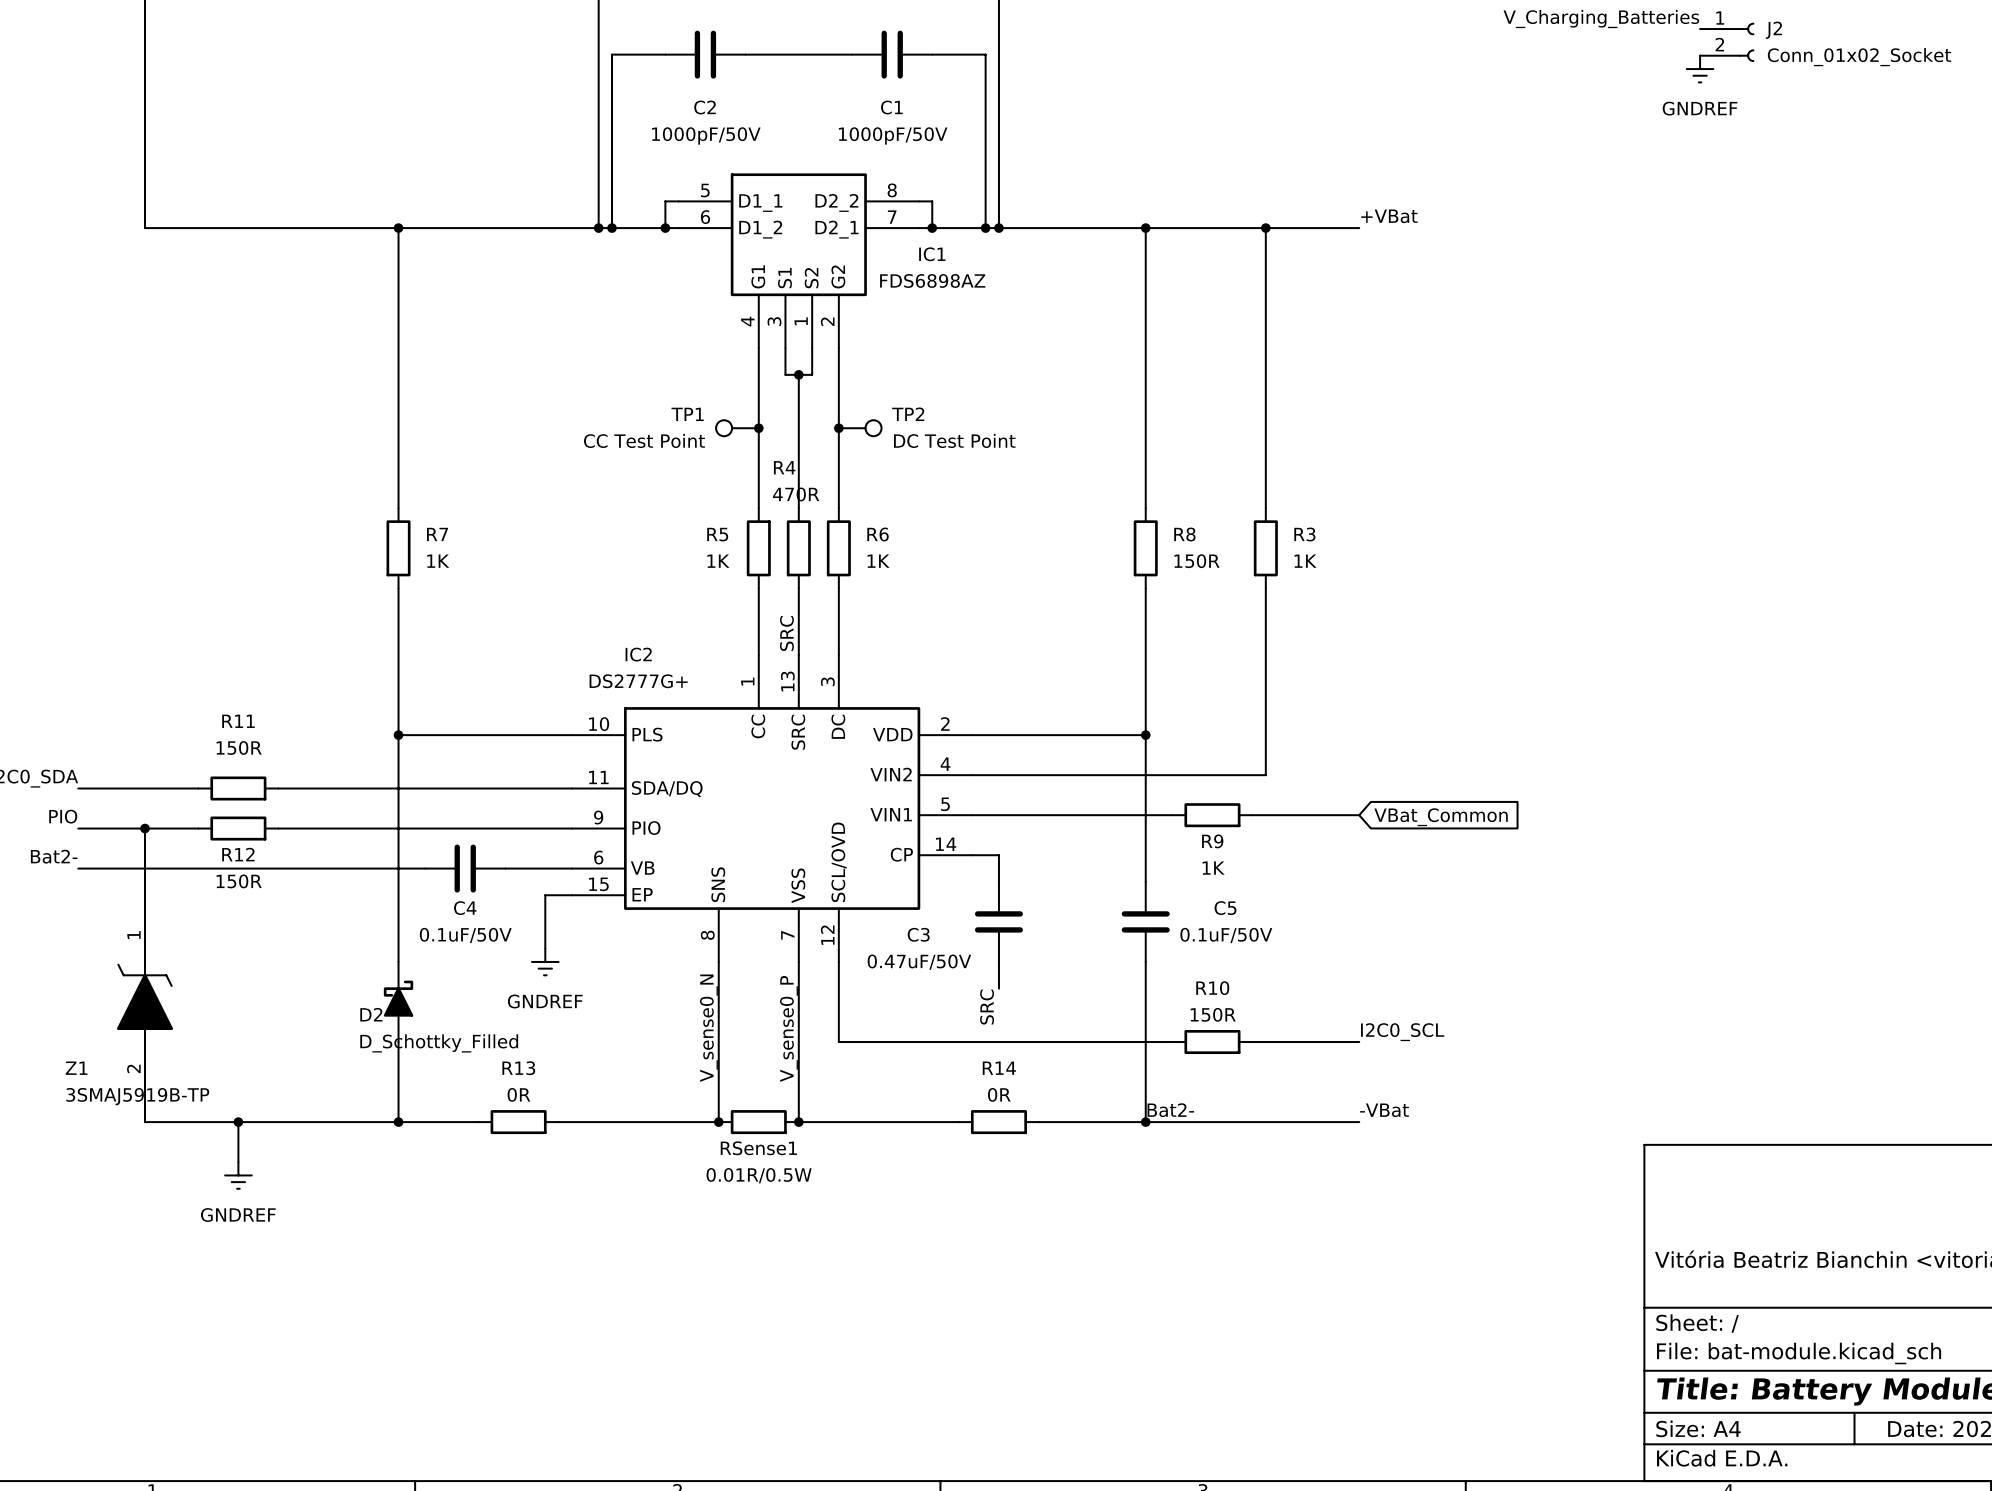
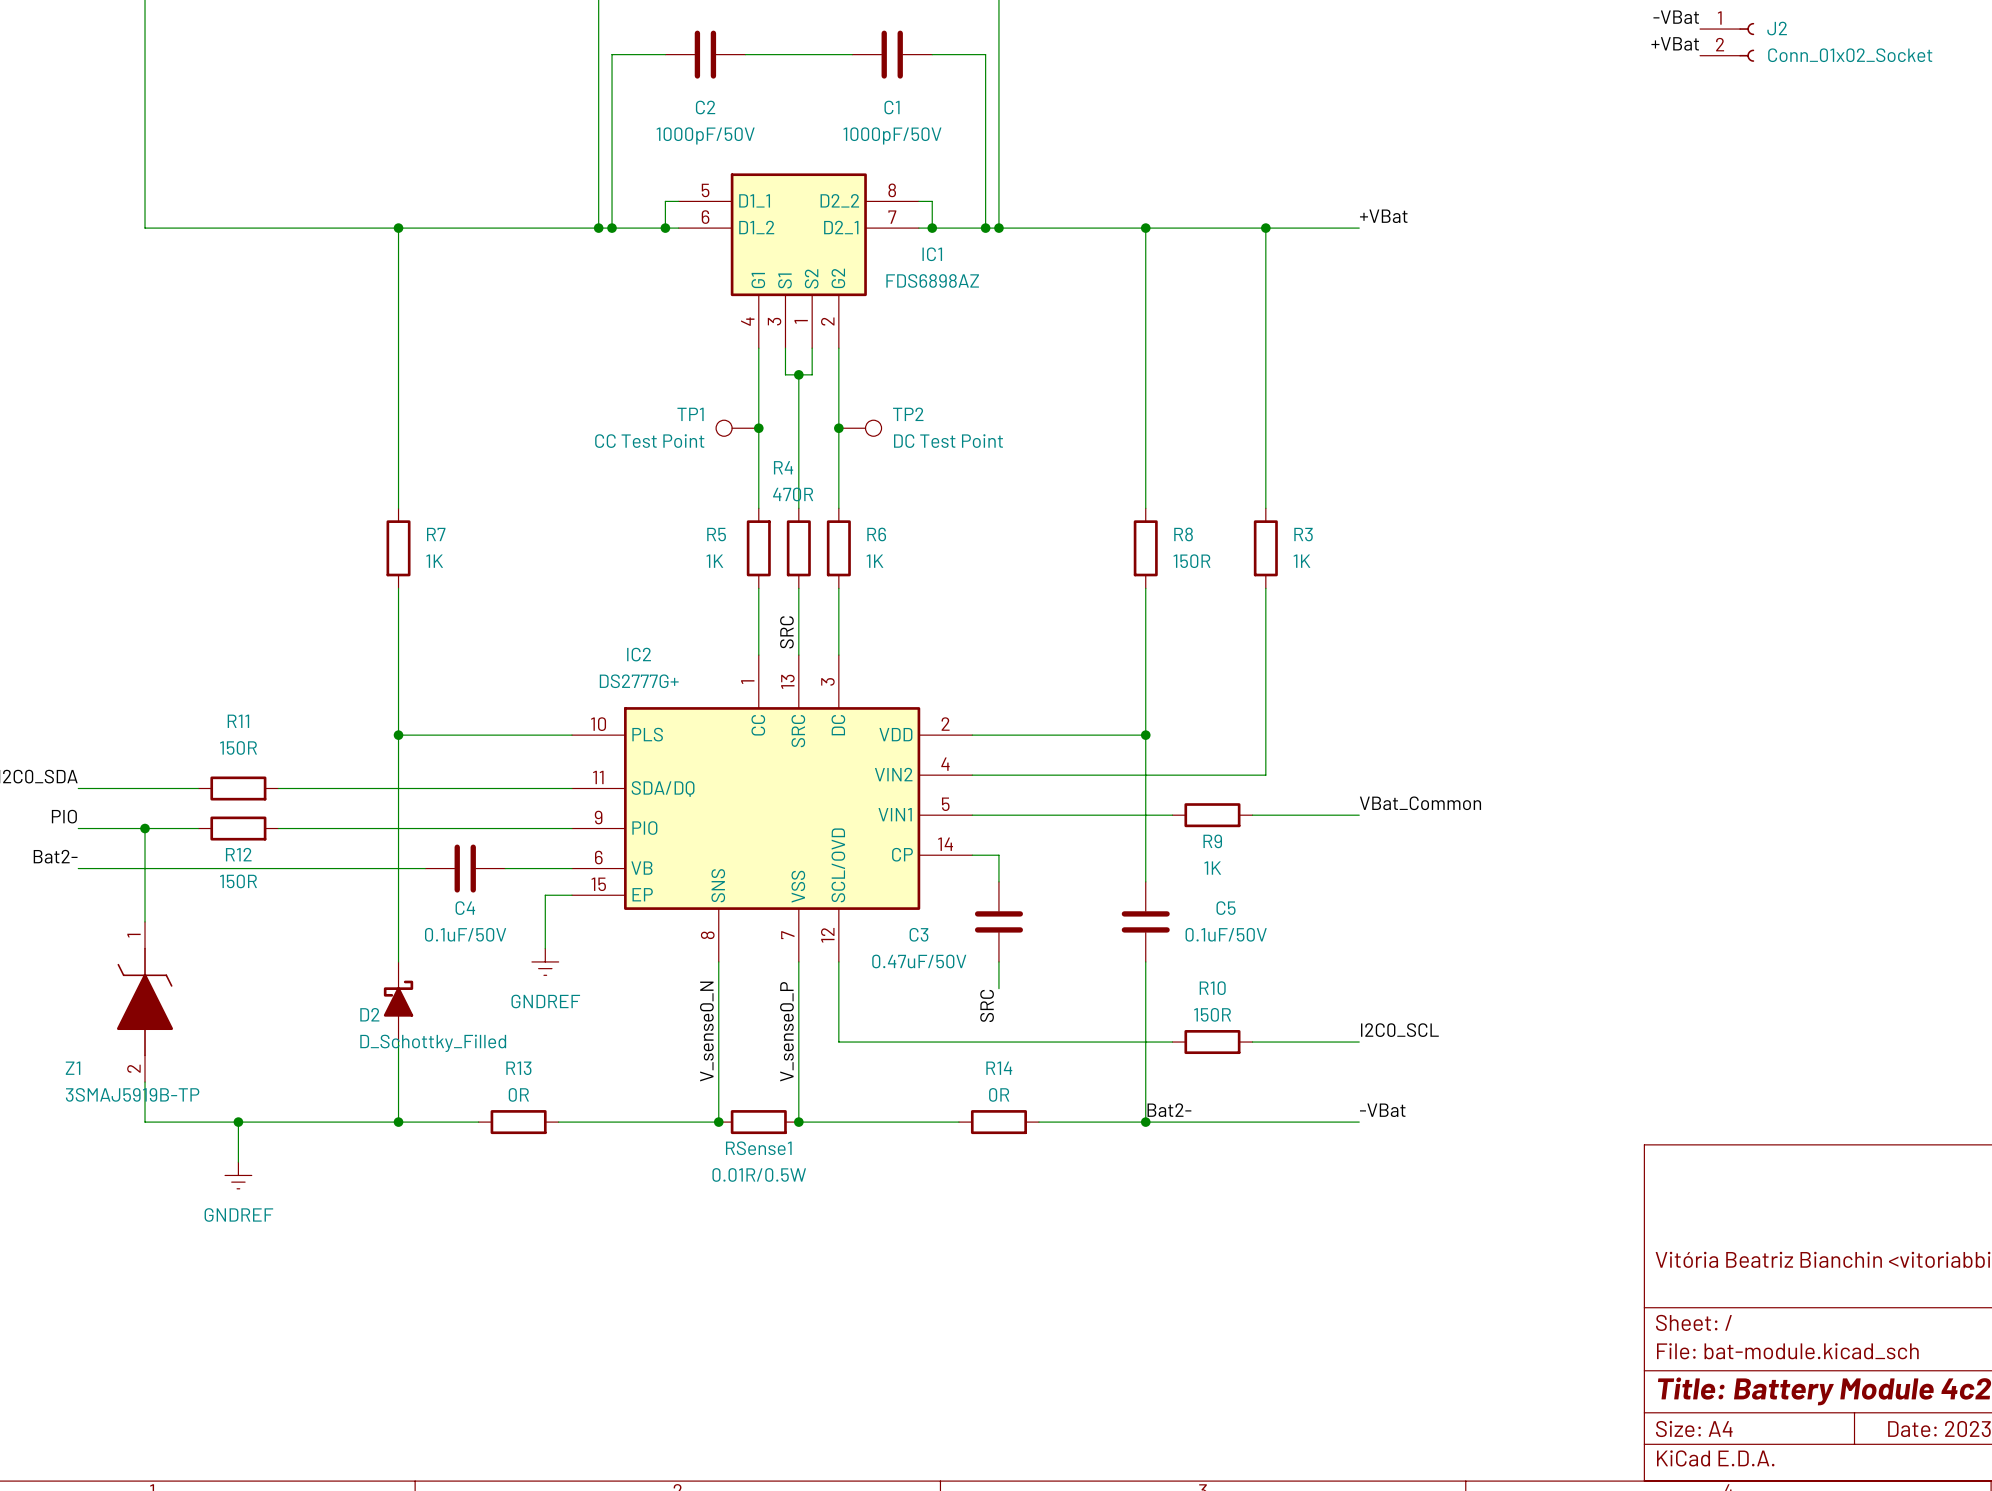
label: V_Charging_Batteries (1601, 18) -> -VBat (1676, 17)
label: none -> +VBat (1675, 43)
power symbol: GNDREF (1700, 69) -> none
label: none -> VBat_Common (1420, 803)
global label: VBat_Common (1441, 817) -> none

